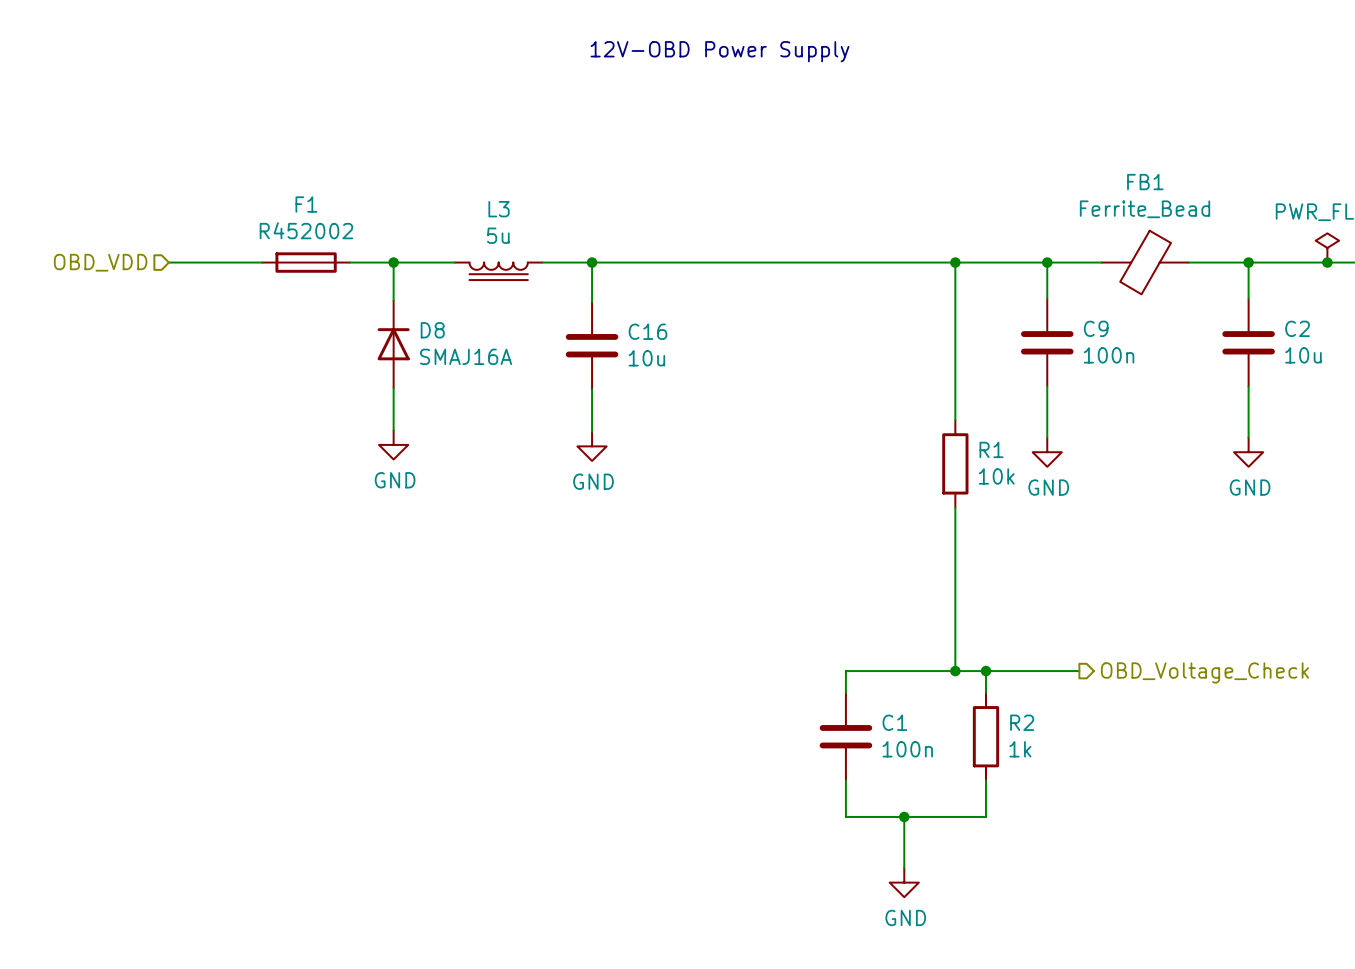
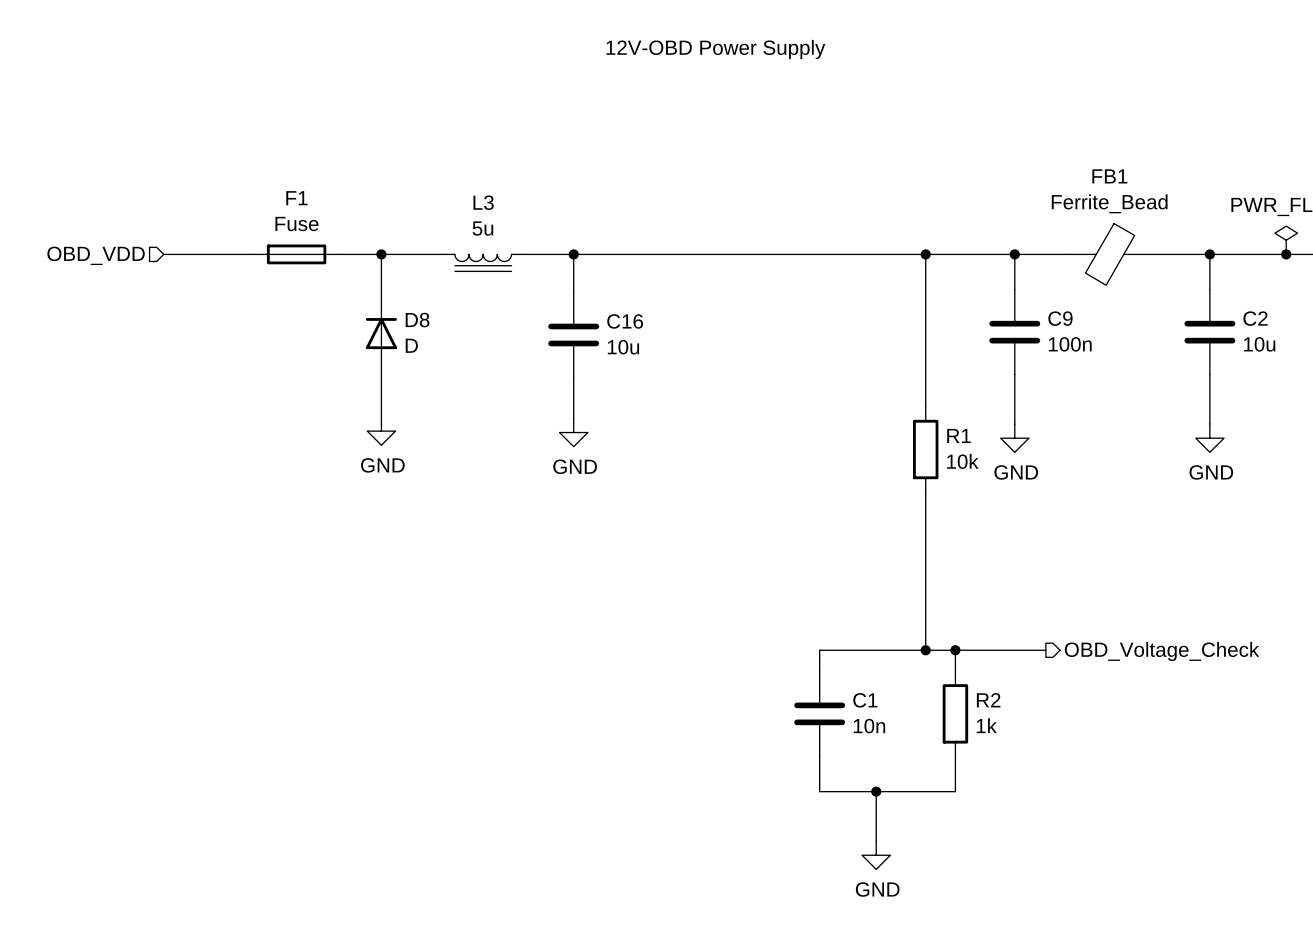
F1 value: R452002 (306, 230) -> Fuse (296, 224)
D8 value: SMAJ16A (466, 356) -> D (411, 345)
C1 value: 100n (907, 749) -> 10n (869, 726)

